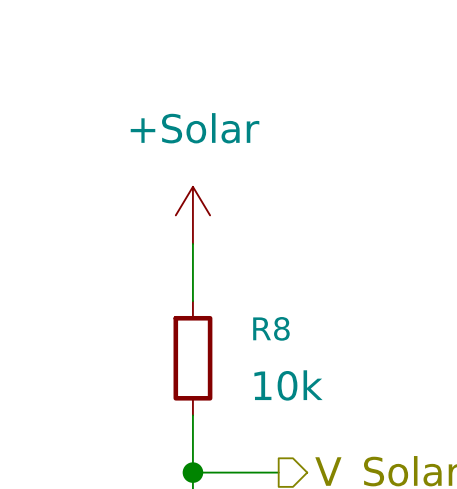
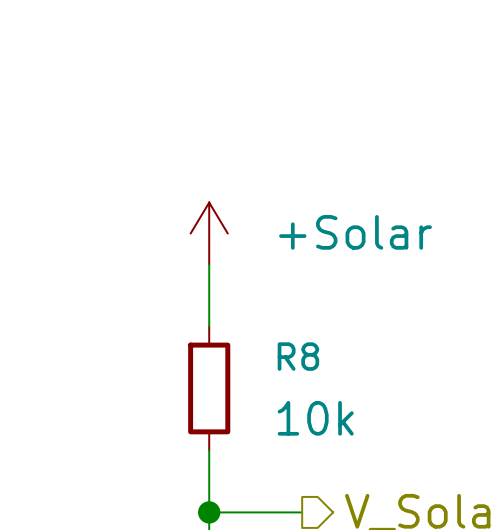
power symbol text position: +Solar (195, 128) -> +Solar (355, 232)

